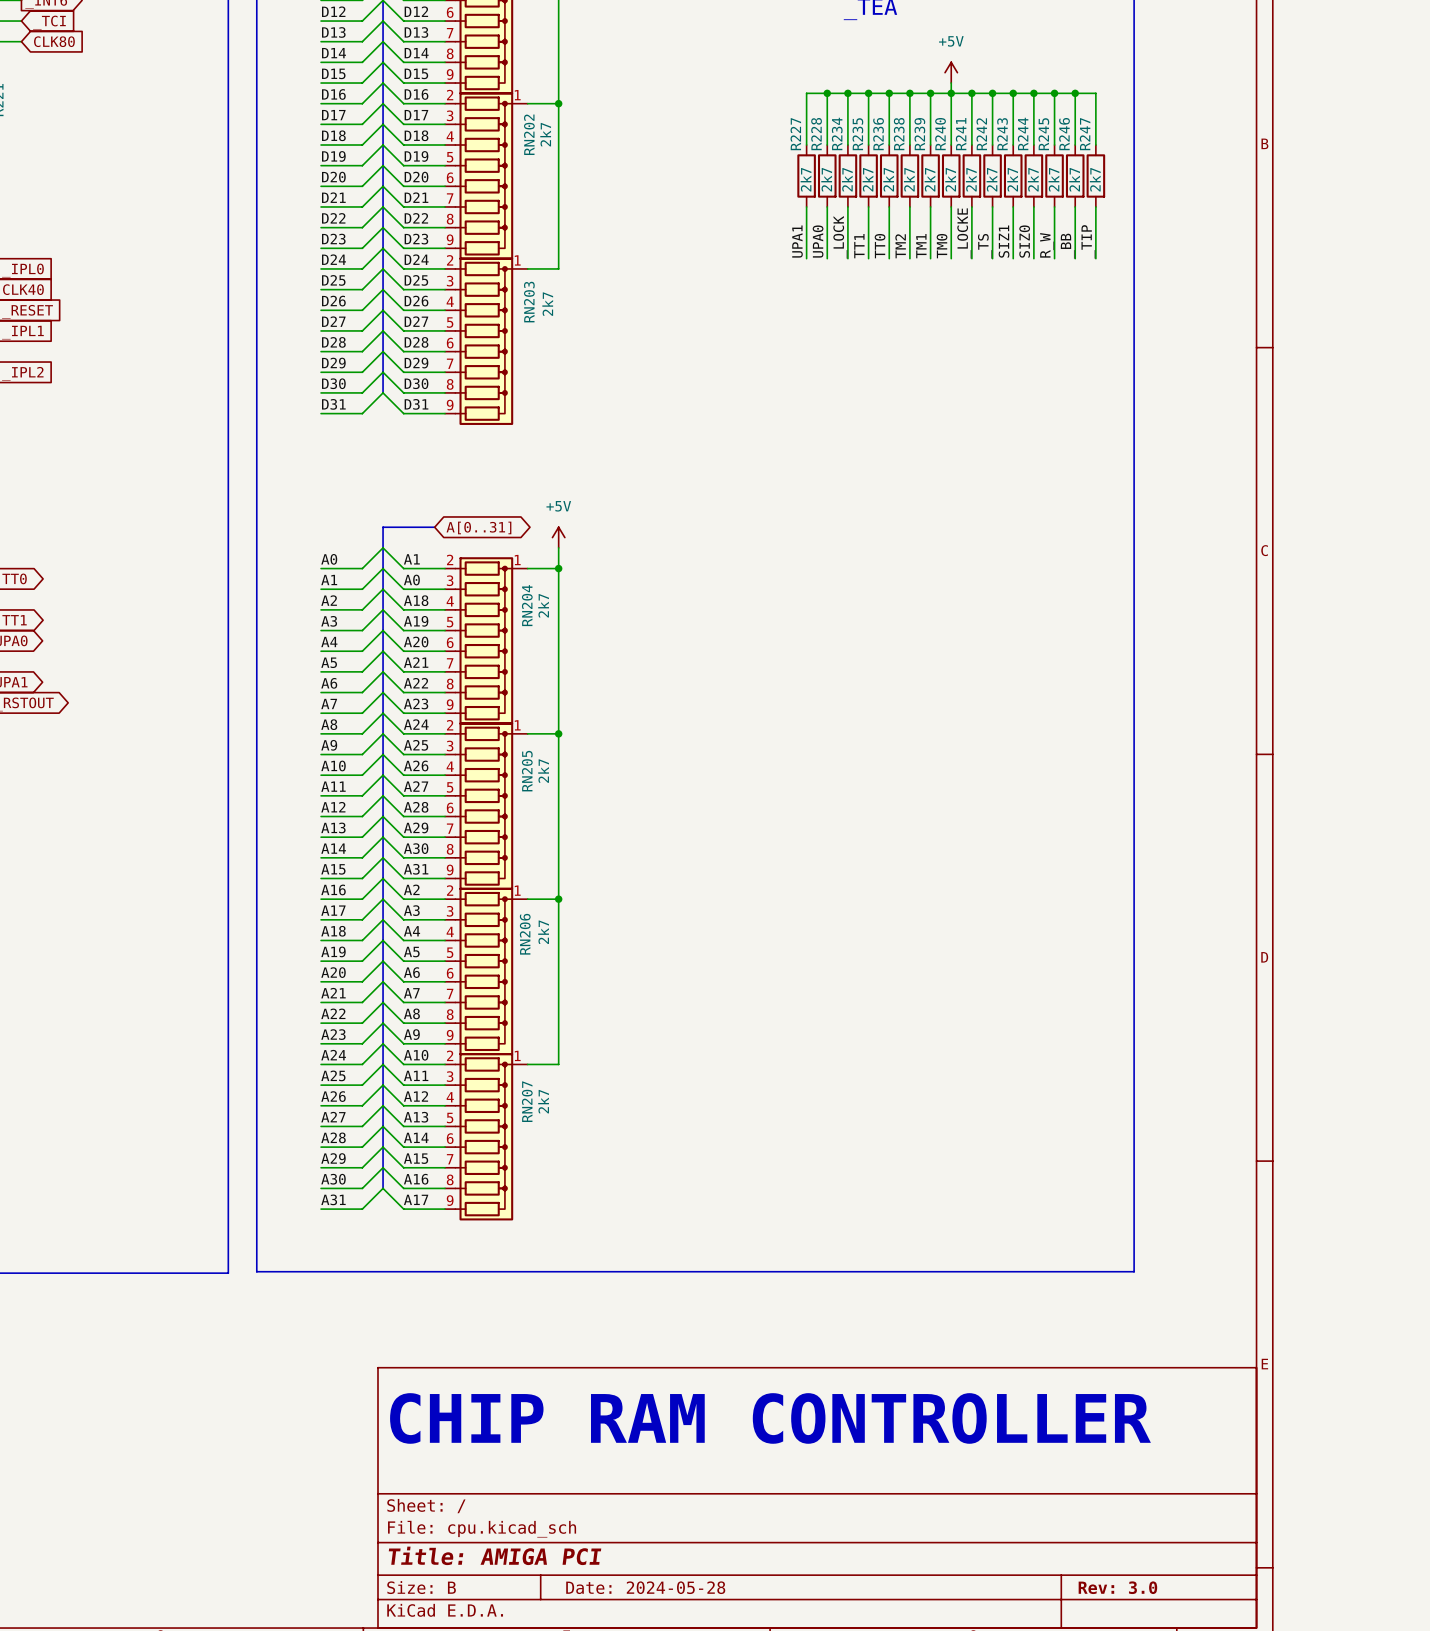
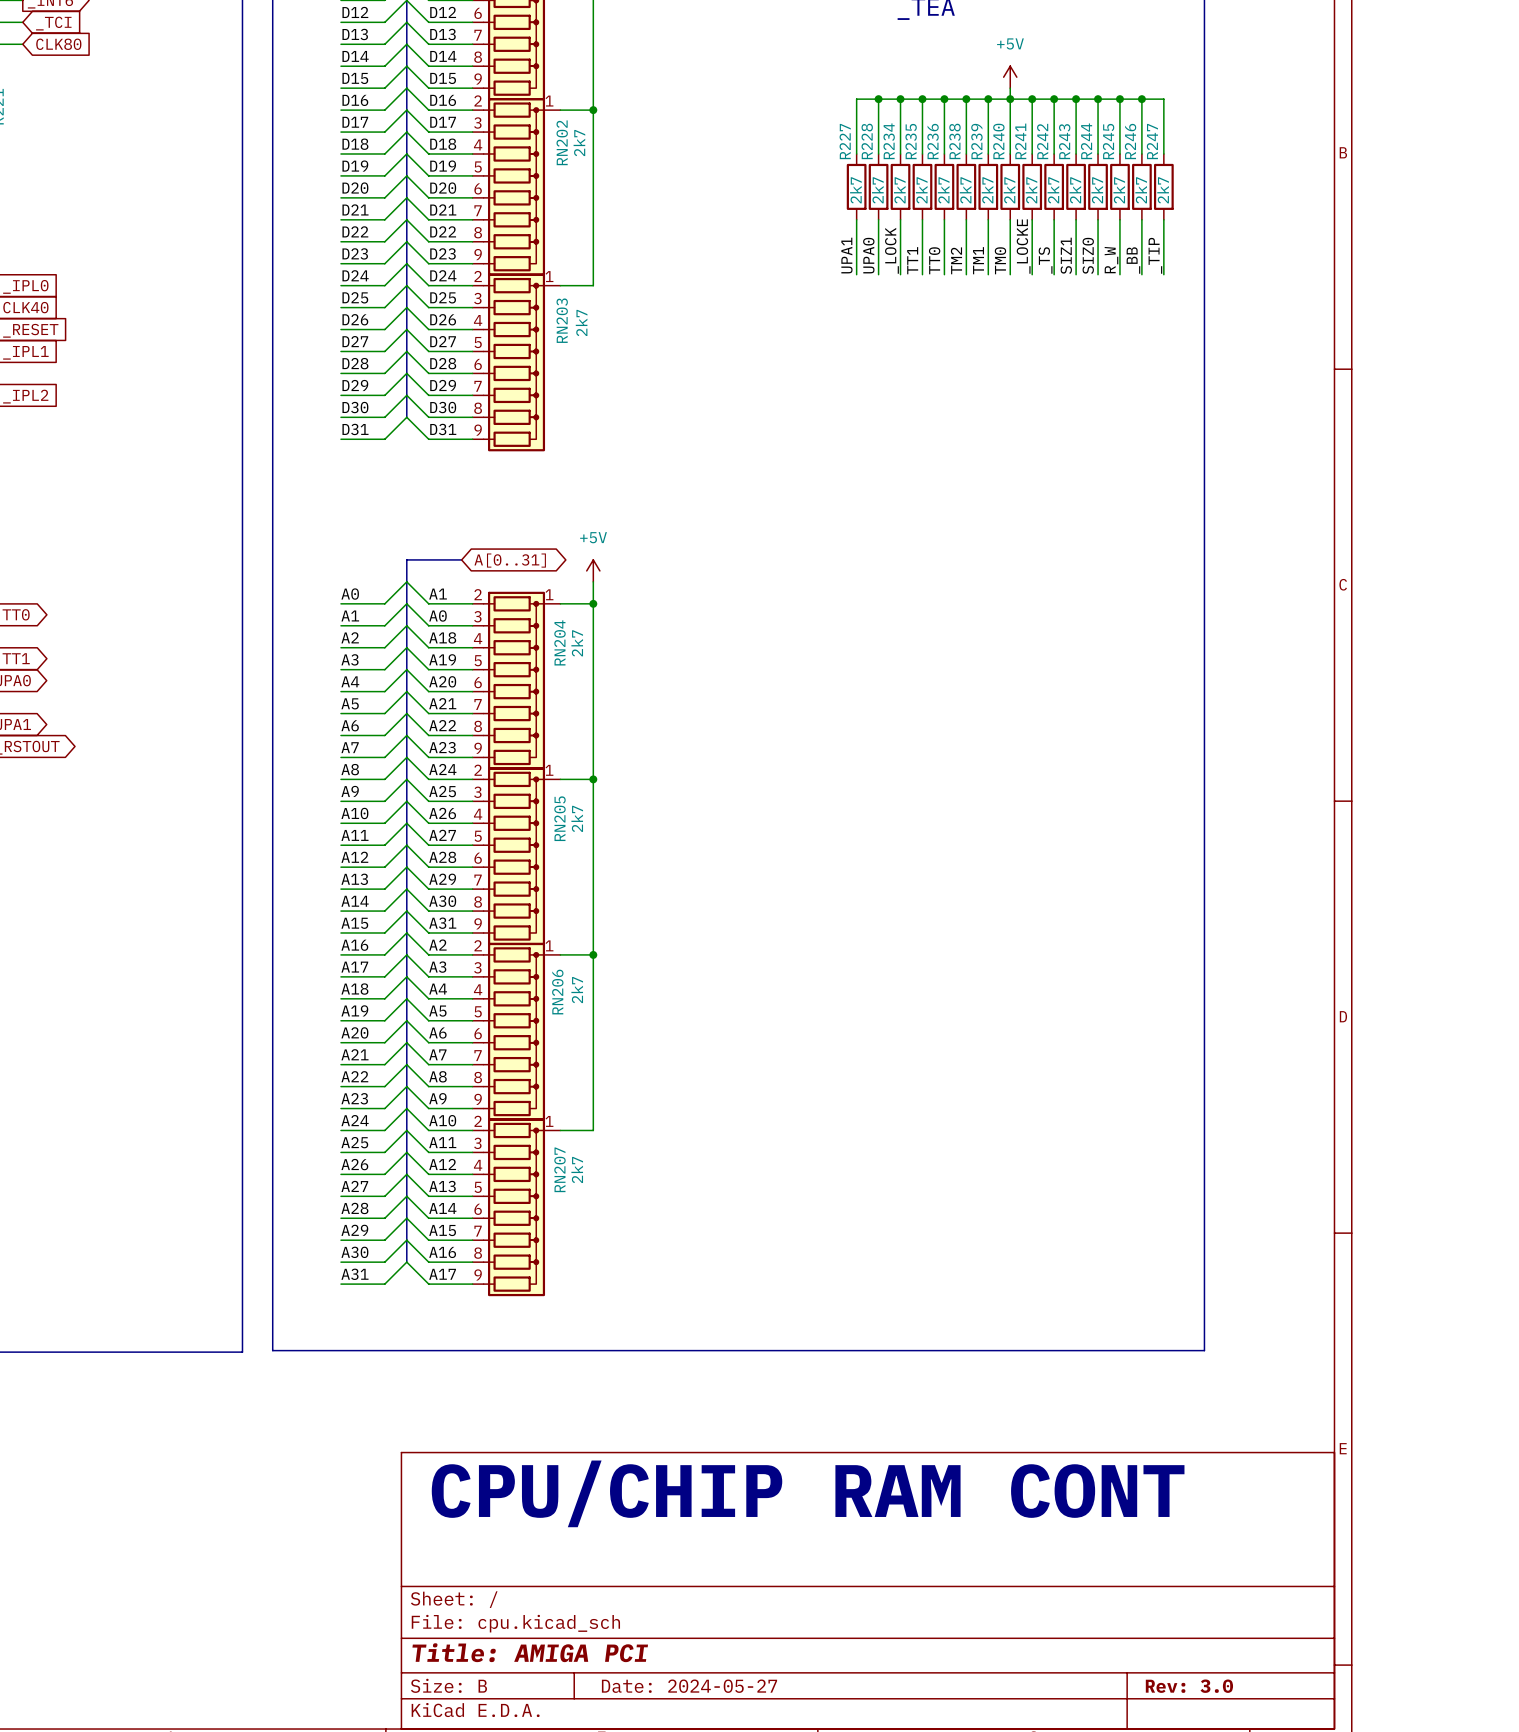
text: CHIP RAM CONTROLLER (770, 1418) -> CPU/CHIP RAM CONT (808, 1493)
title block: Date: 2024-05-28 (645, 1587) -> Date: 2024-05-27 (689, 1686)

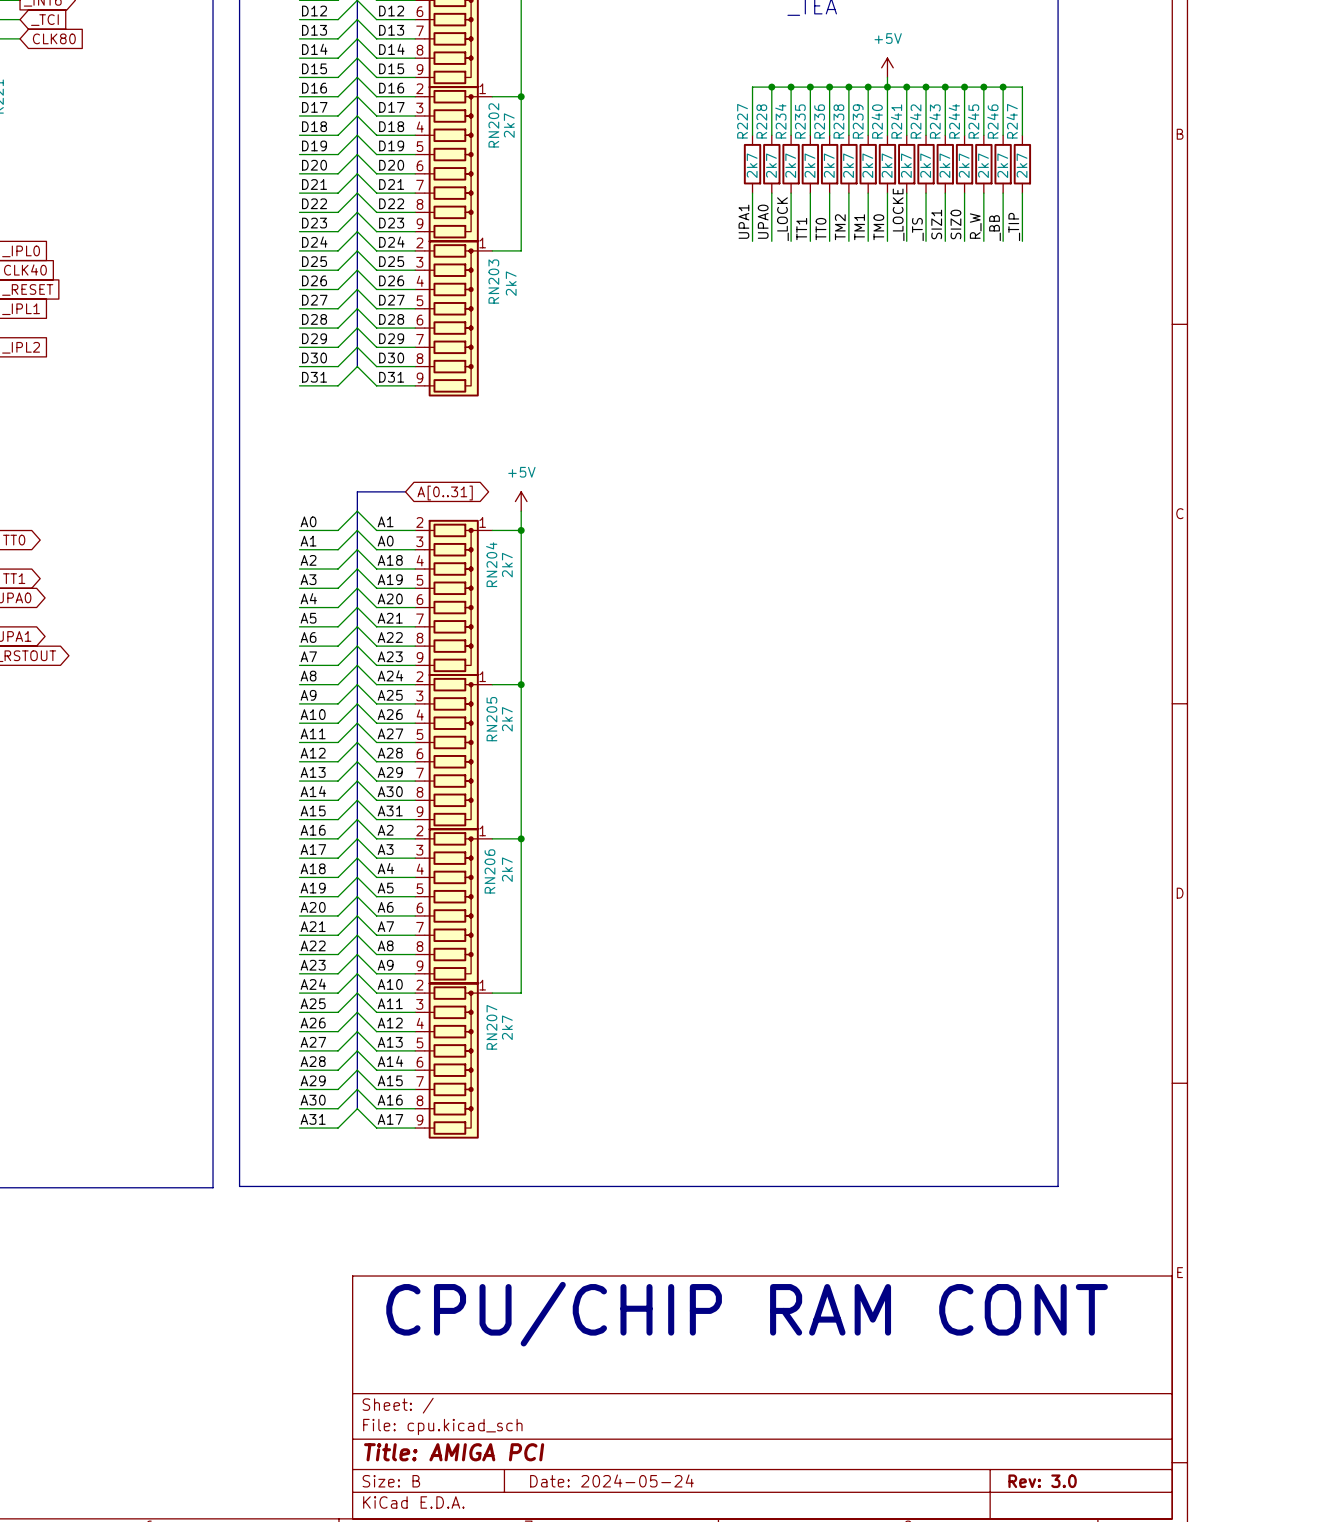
title block: Date: 2024-05-27 (689, 1686) -> Date: 2024-05-24 (611, 1480)

